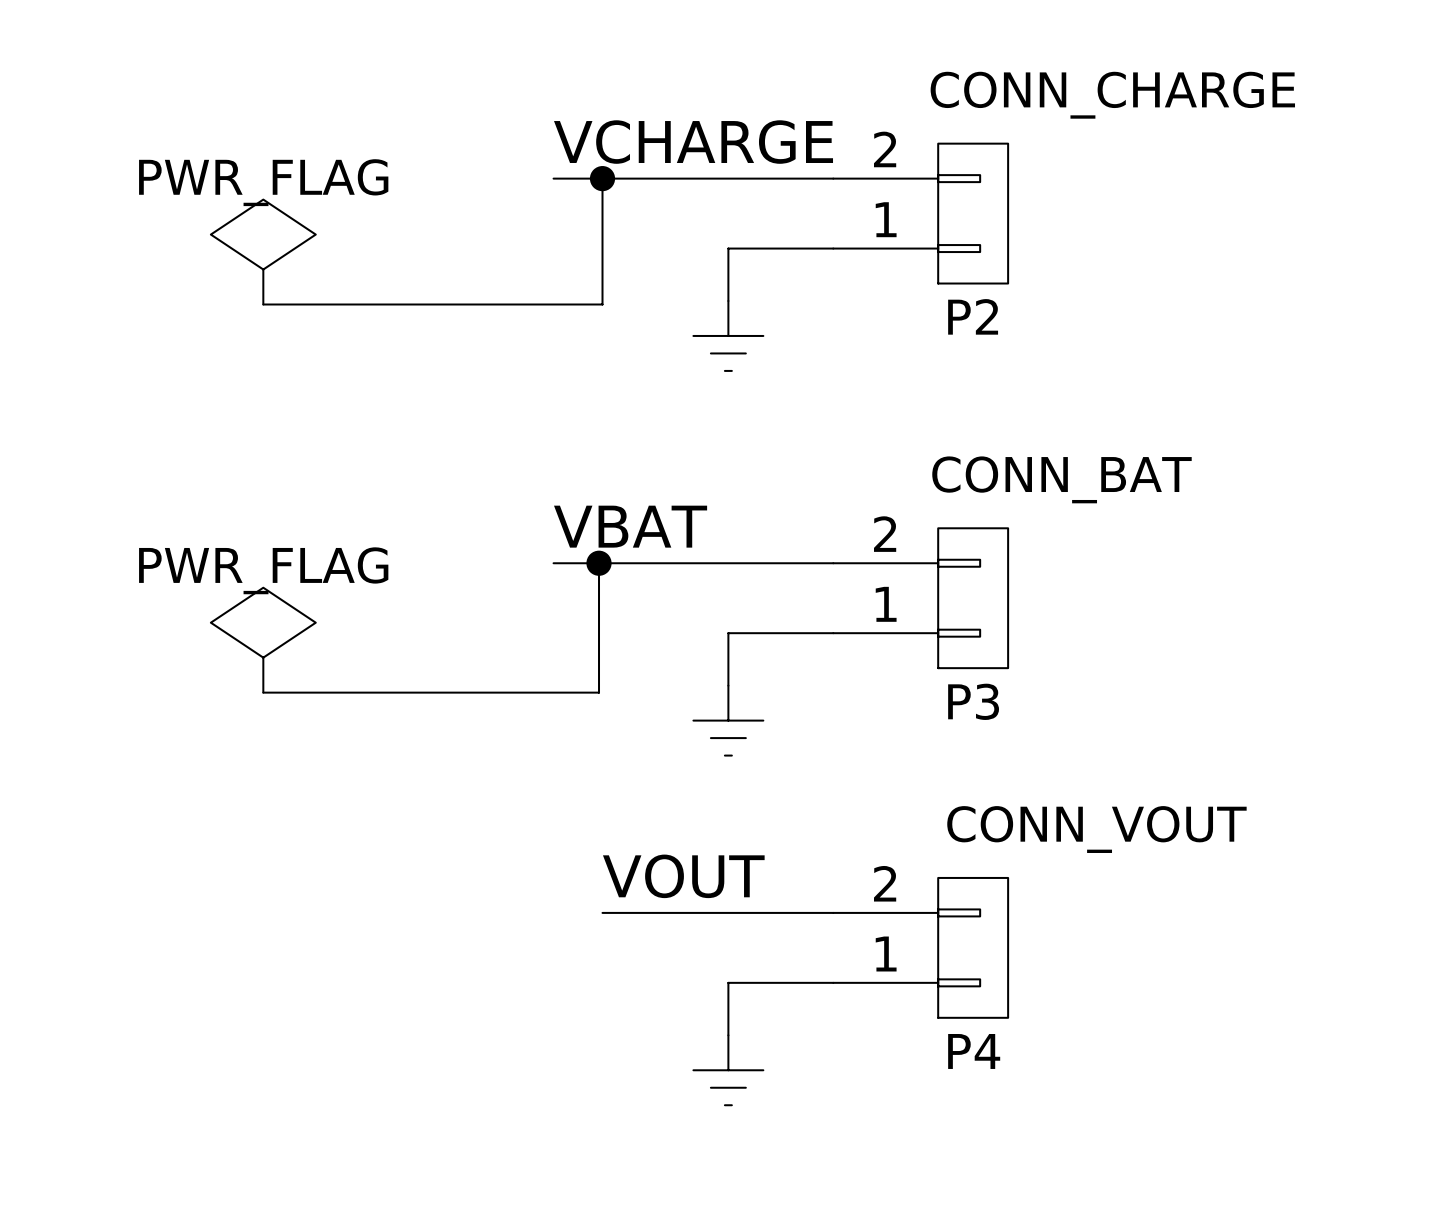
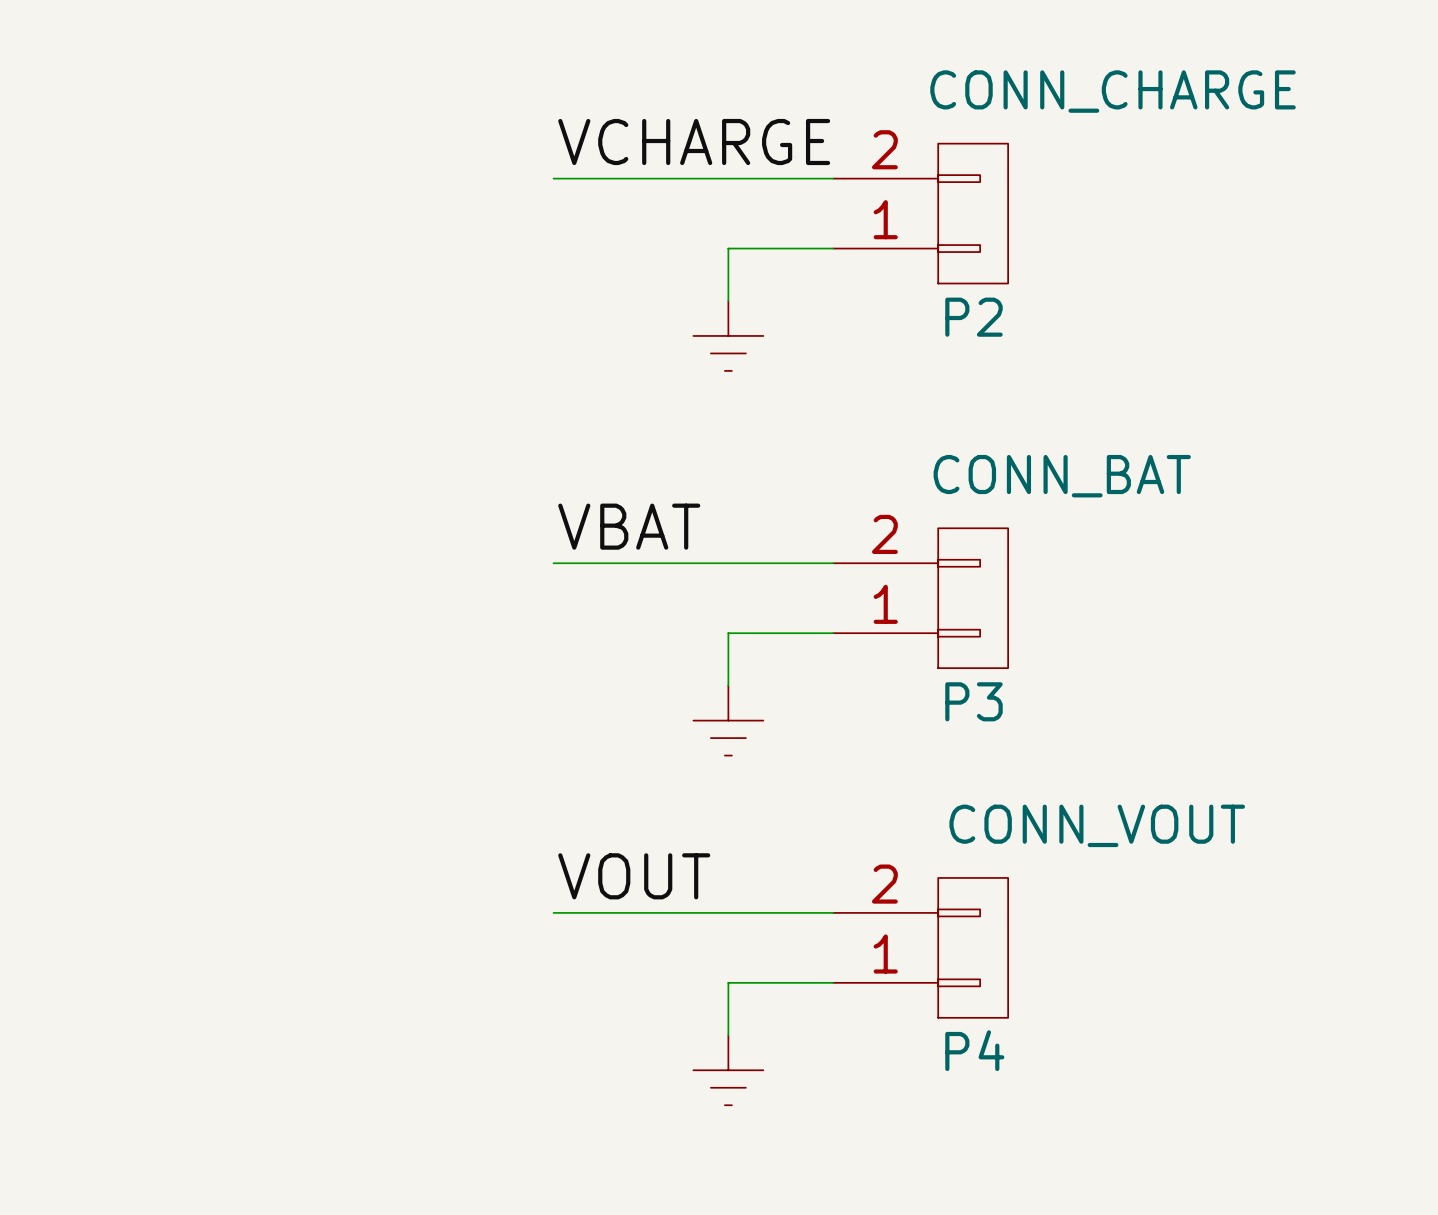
wire: (602, 178) (602, 304) (263, 304) -> none
junction: (602, 178) -> none
power symbol: PWR_FLAG (263, 252) -> none
wire: (599, 563) (599, 692) (263, 692) -> none
junction: (599, 563) -> none
power symbol: PWR_FLAG (263, 640) -> none
label position: VOUT (683, 876) -> VOUT (634, 876)
wire: none -> (553, 912) (602, 912)

